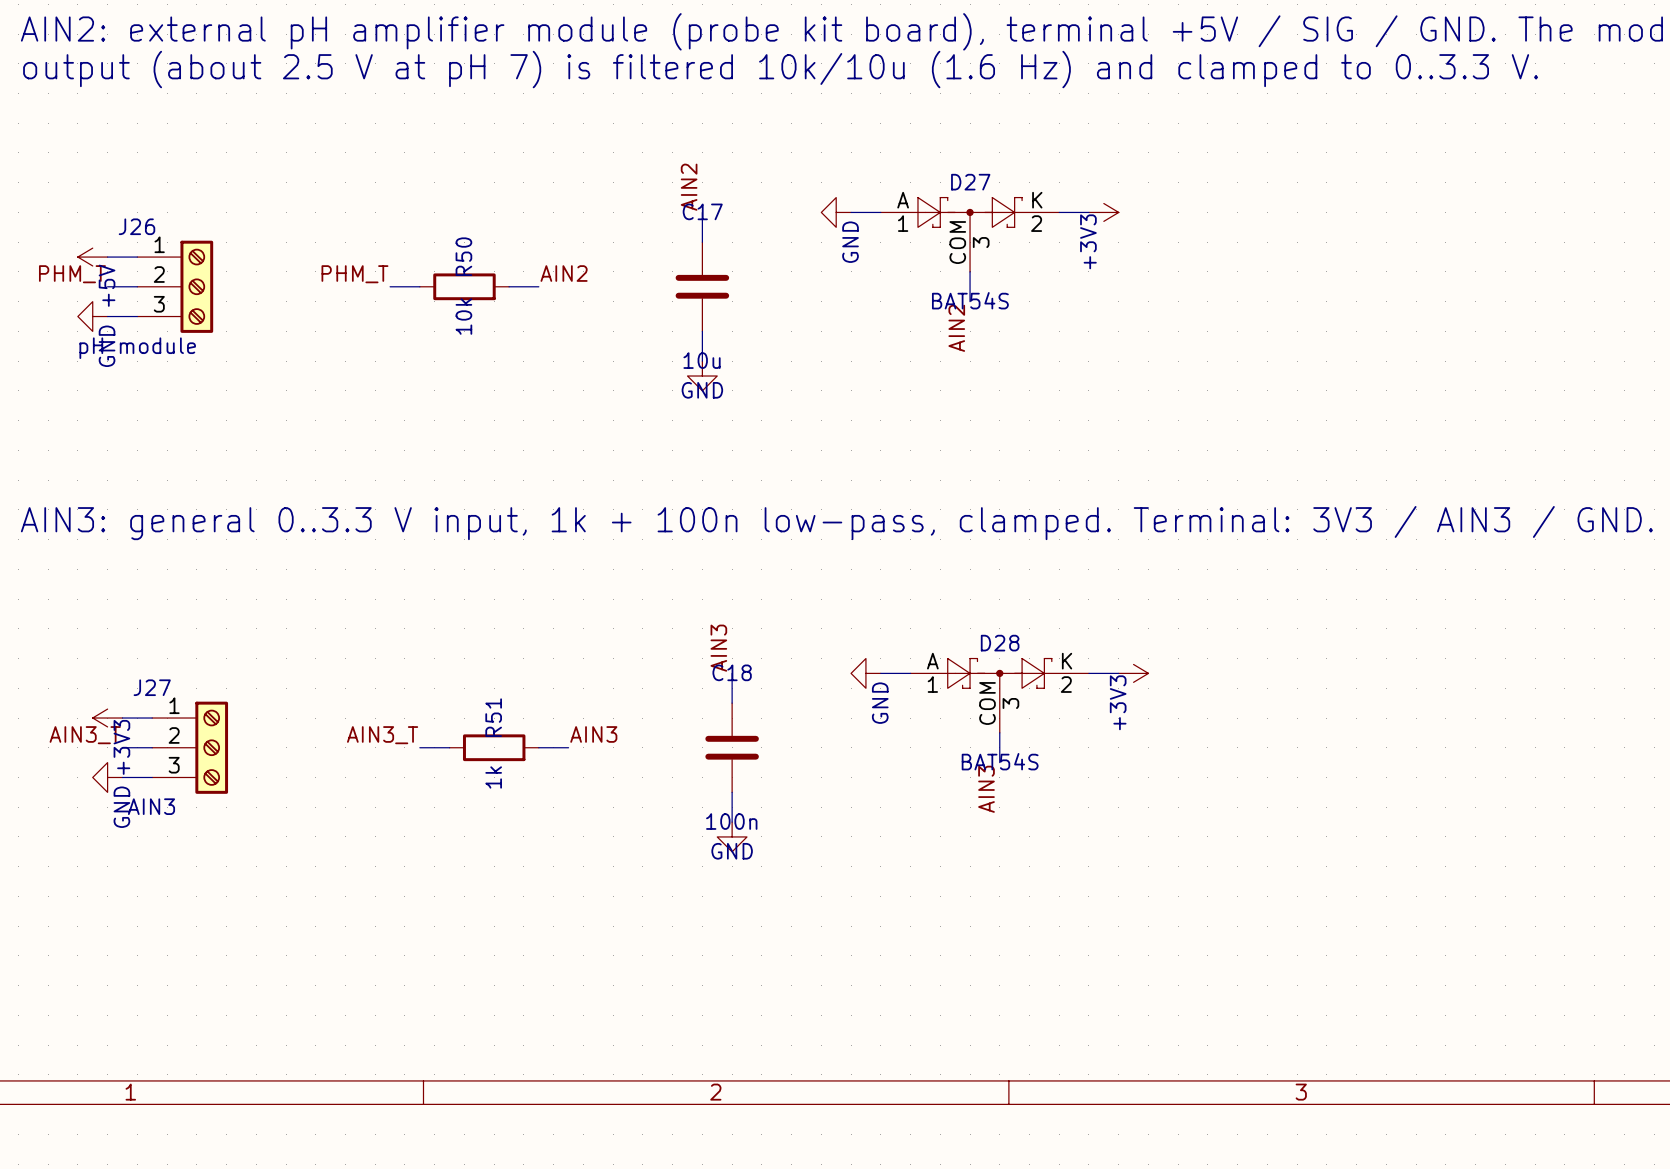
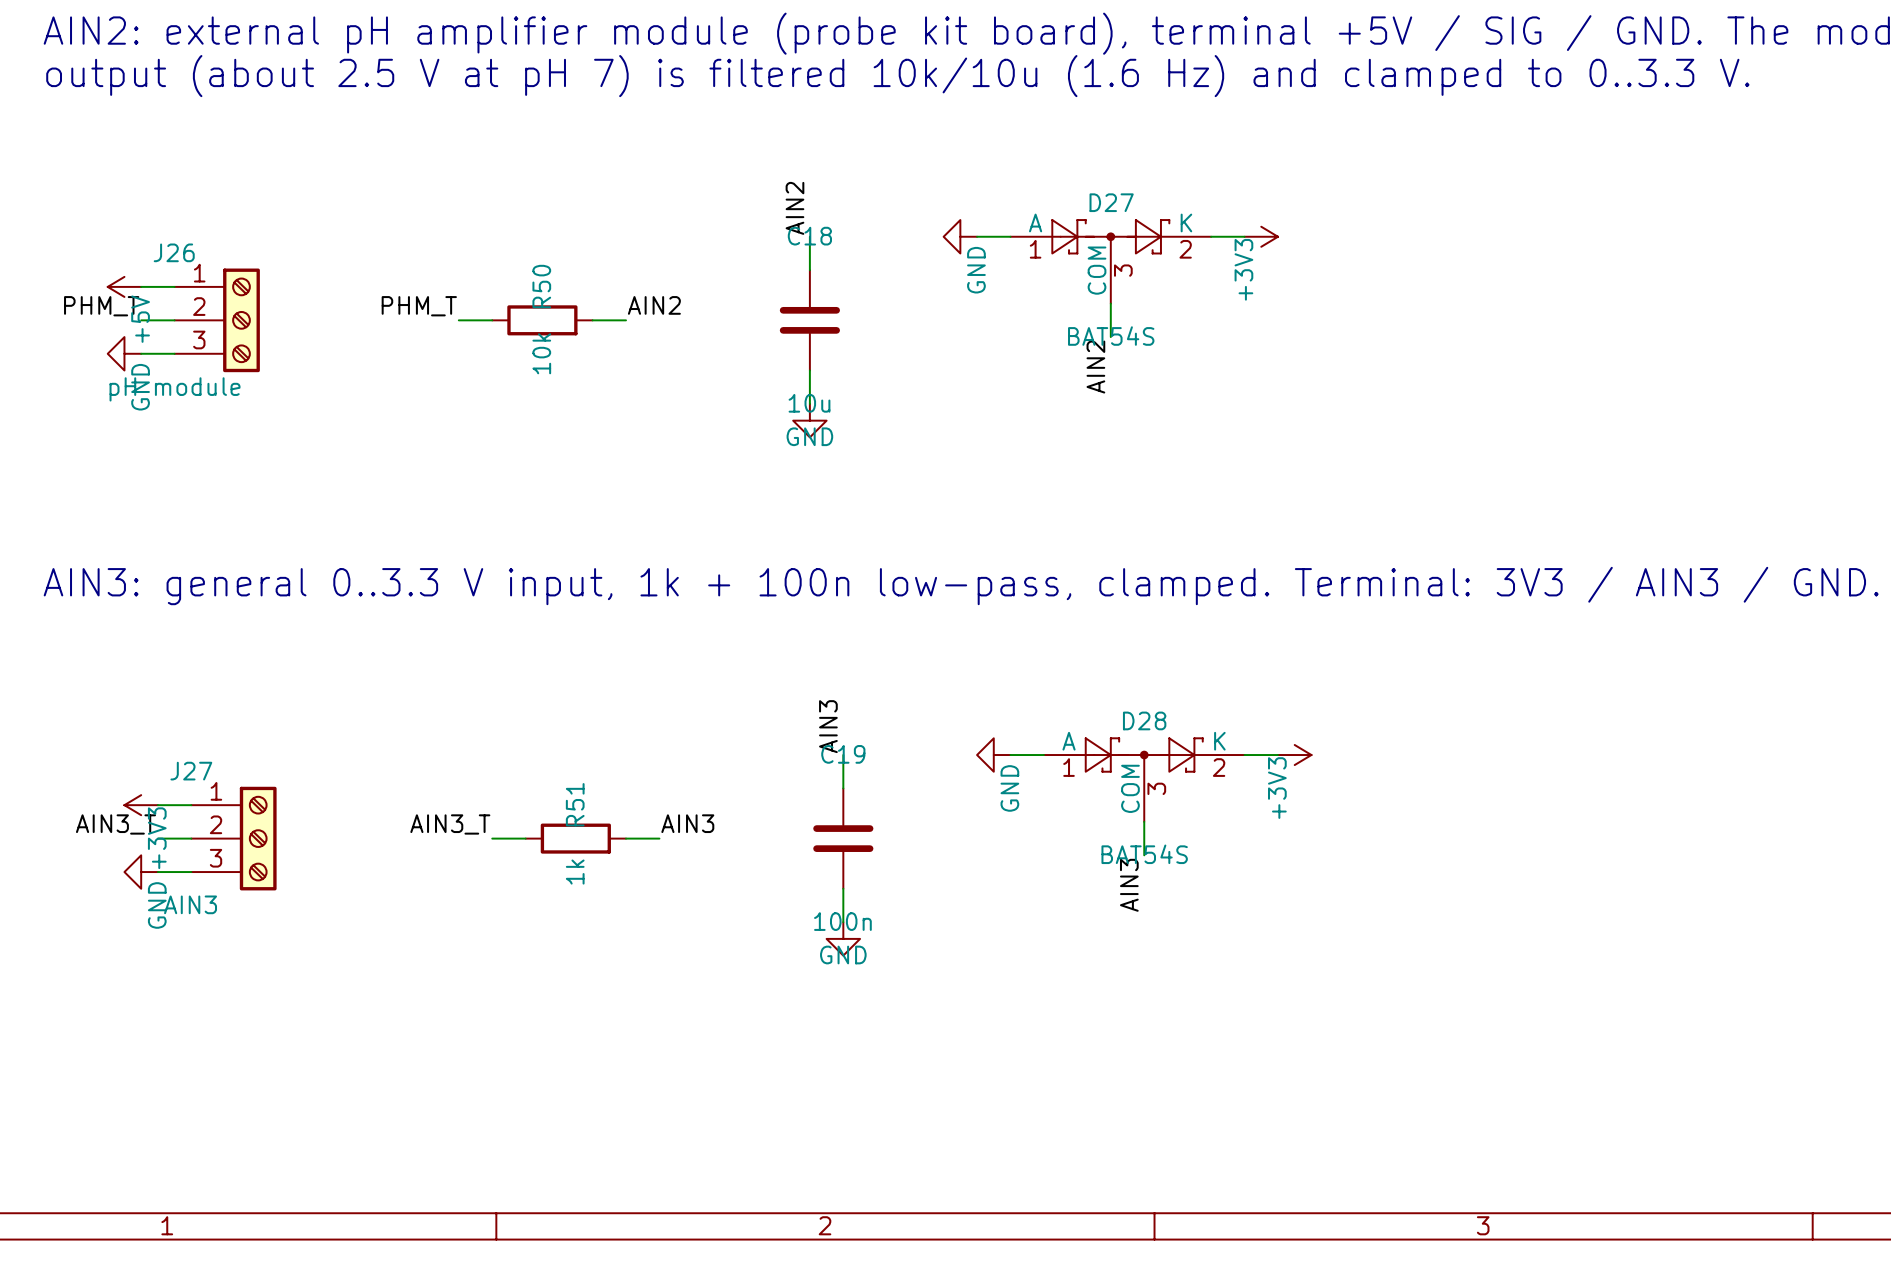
C17 name: C17 (702, 211) -> C18 (809, 236)
C18 name: C18 (732, 672) -> C19 (843, 754)

